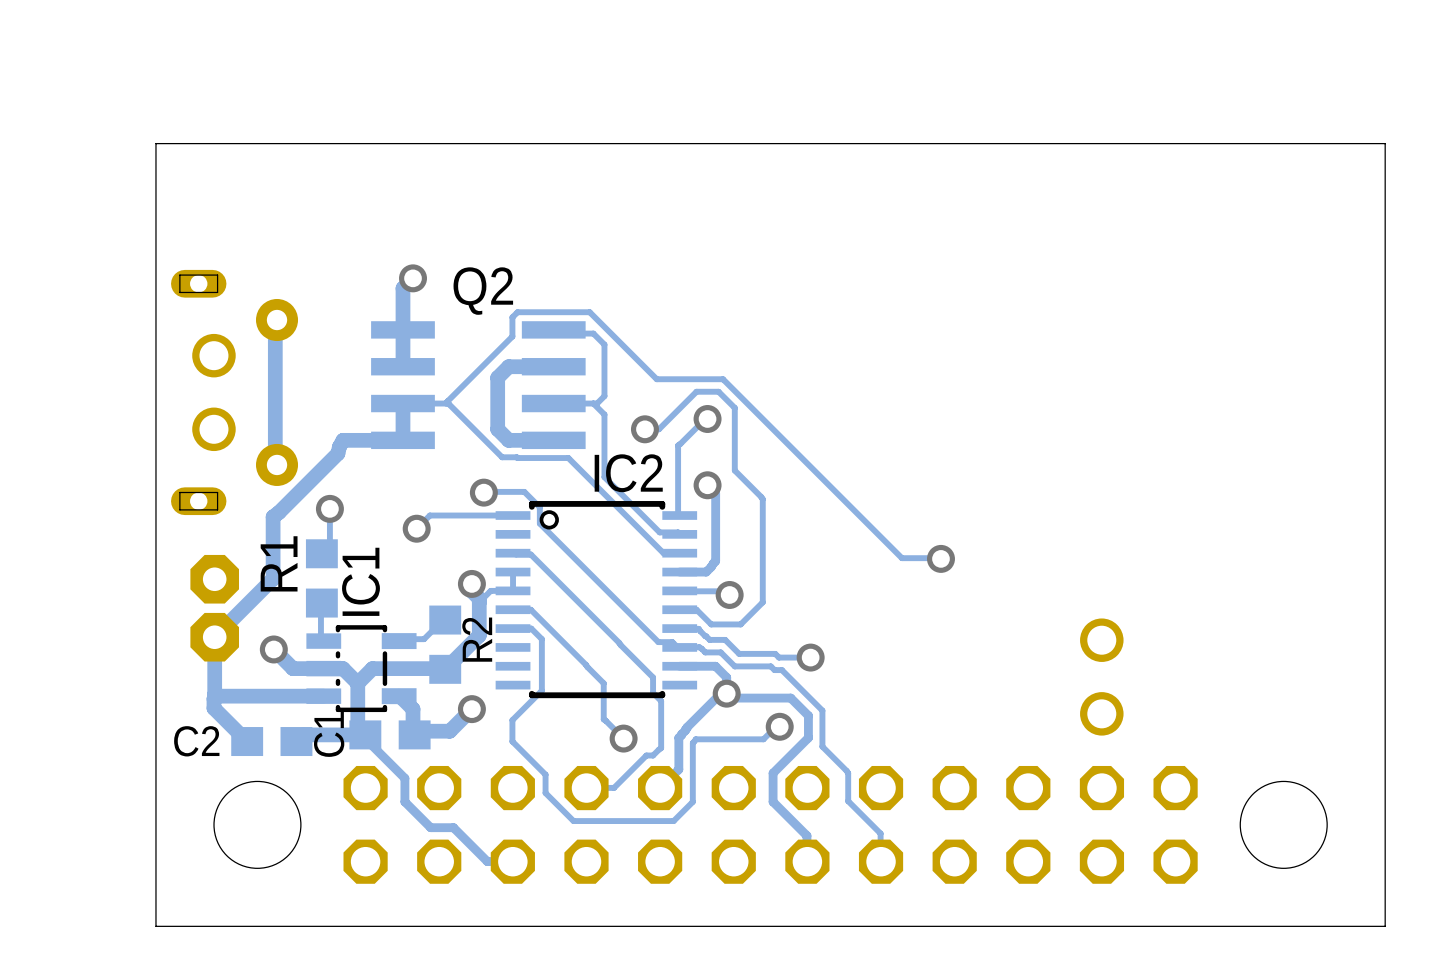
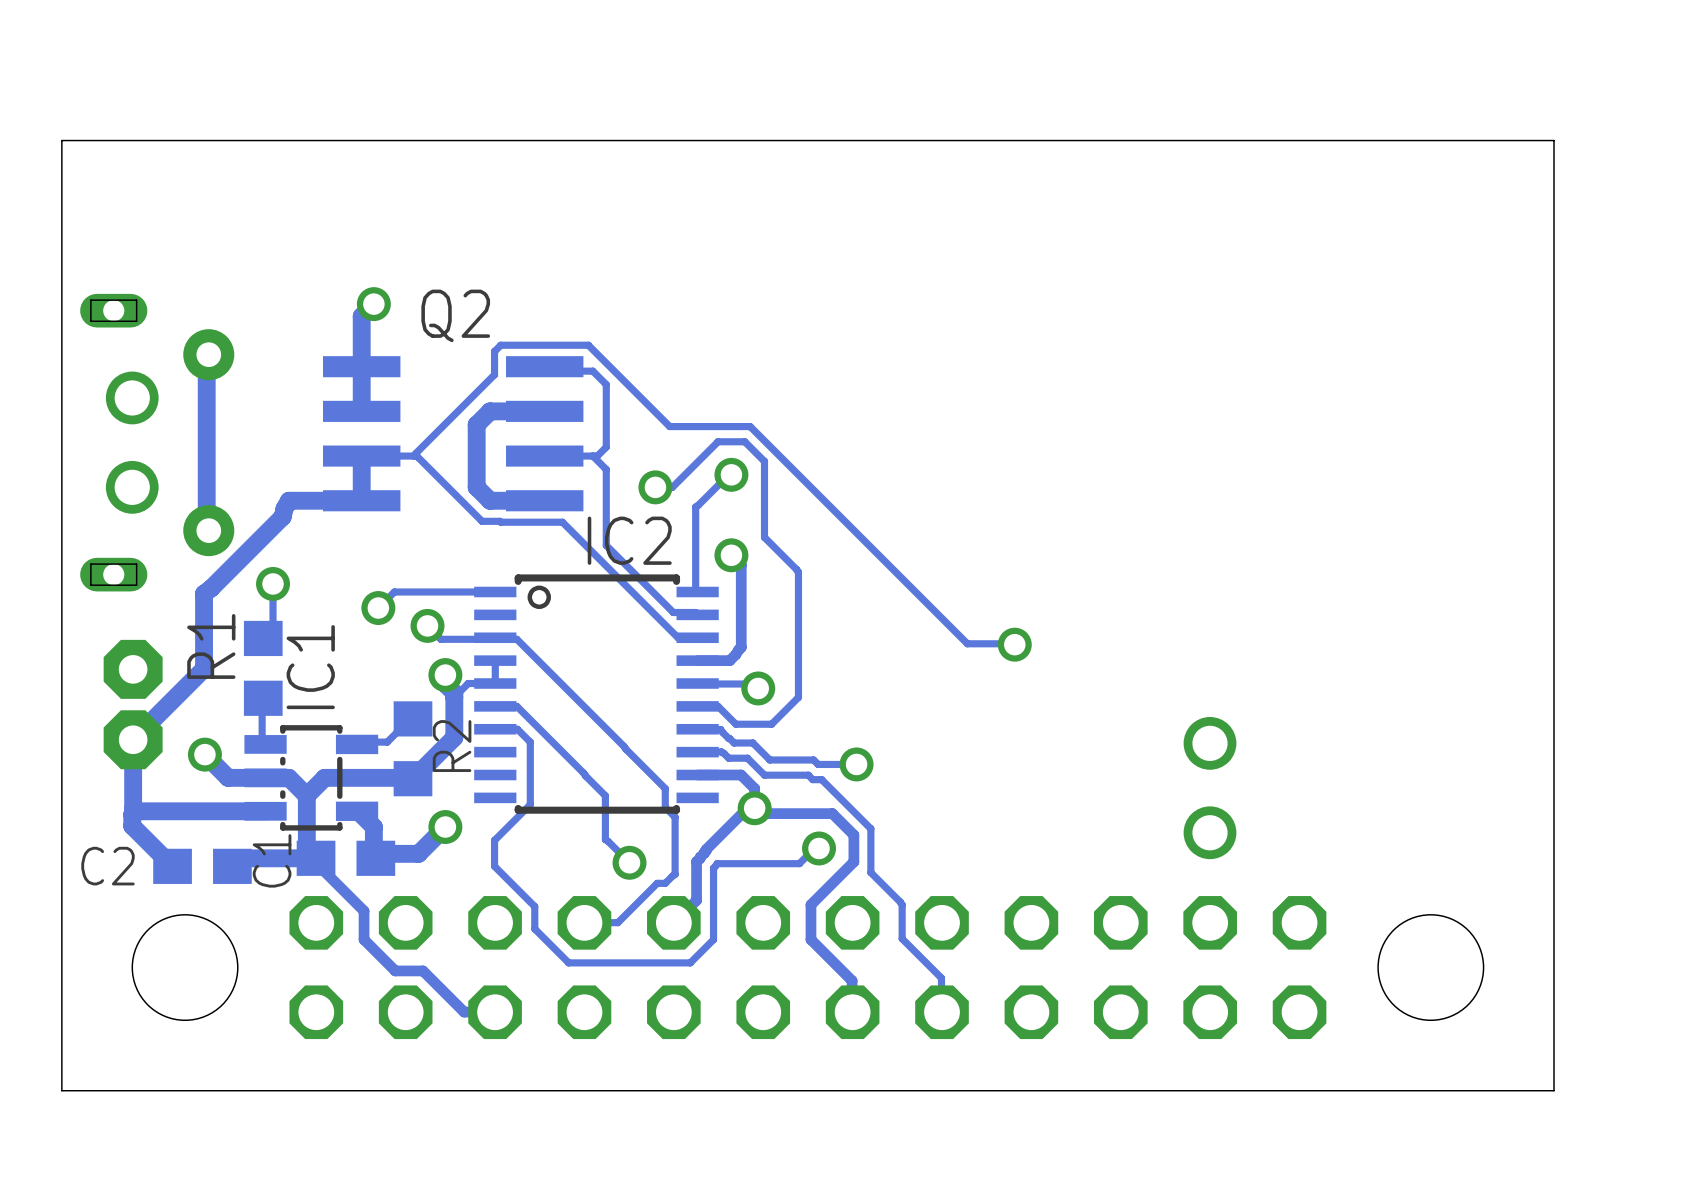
track: (477, 491) (524, 491) (539, 507) (539, 523) (658, 642) (672, 642) (679, 647) -> none
via position: (483, 492) -> (427, 625)
track: none -> (427, 625) (440, 639) (494, 639) (495, 637)

